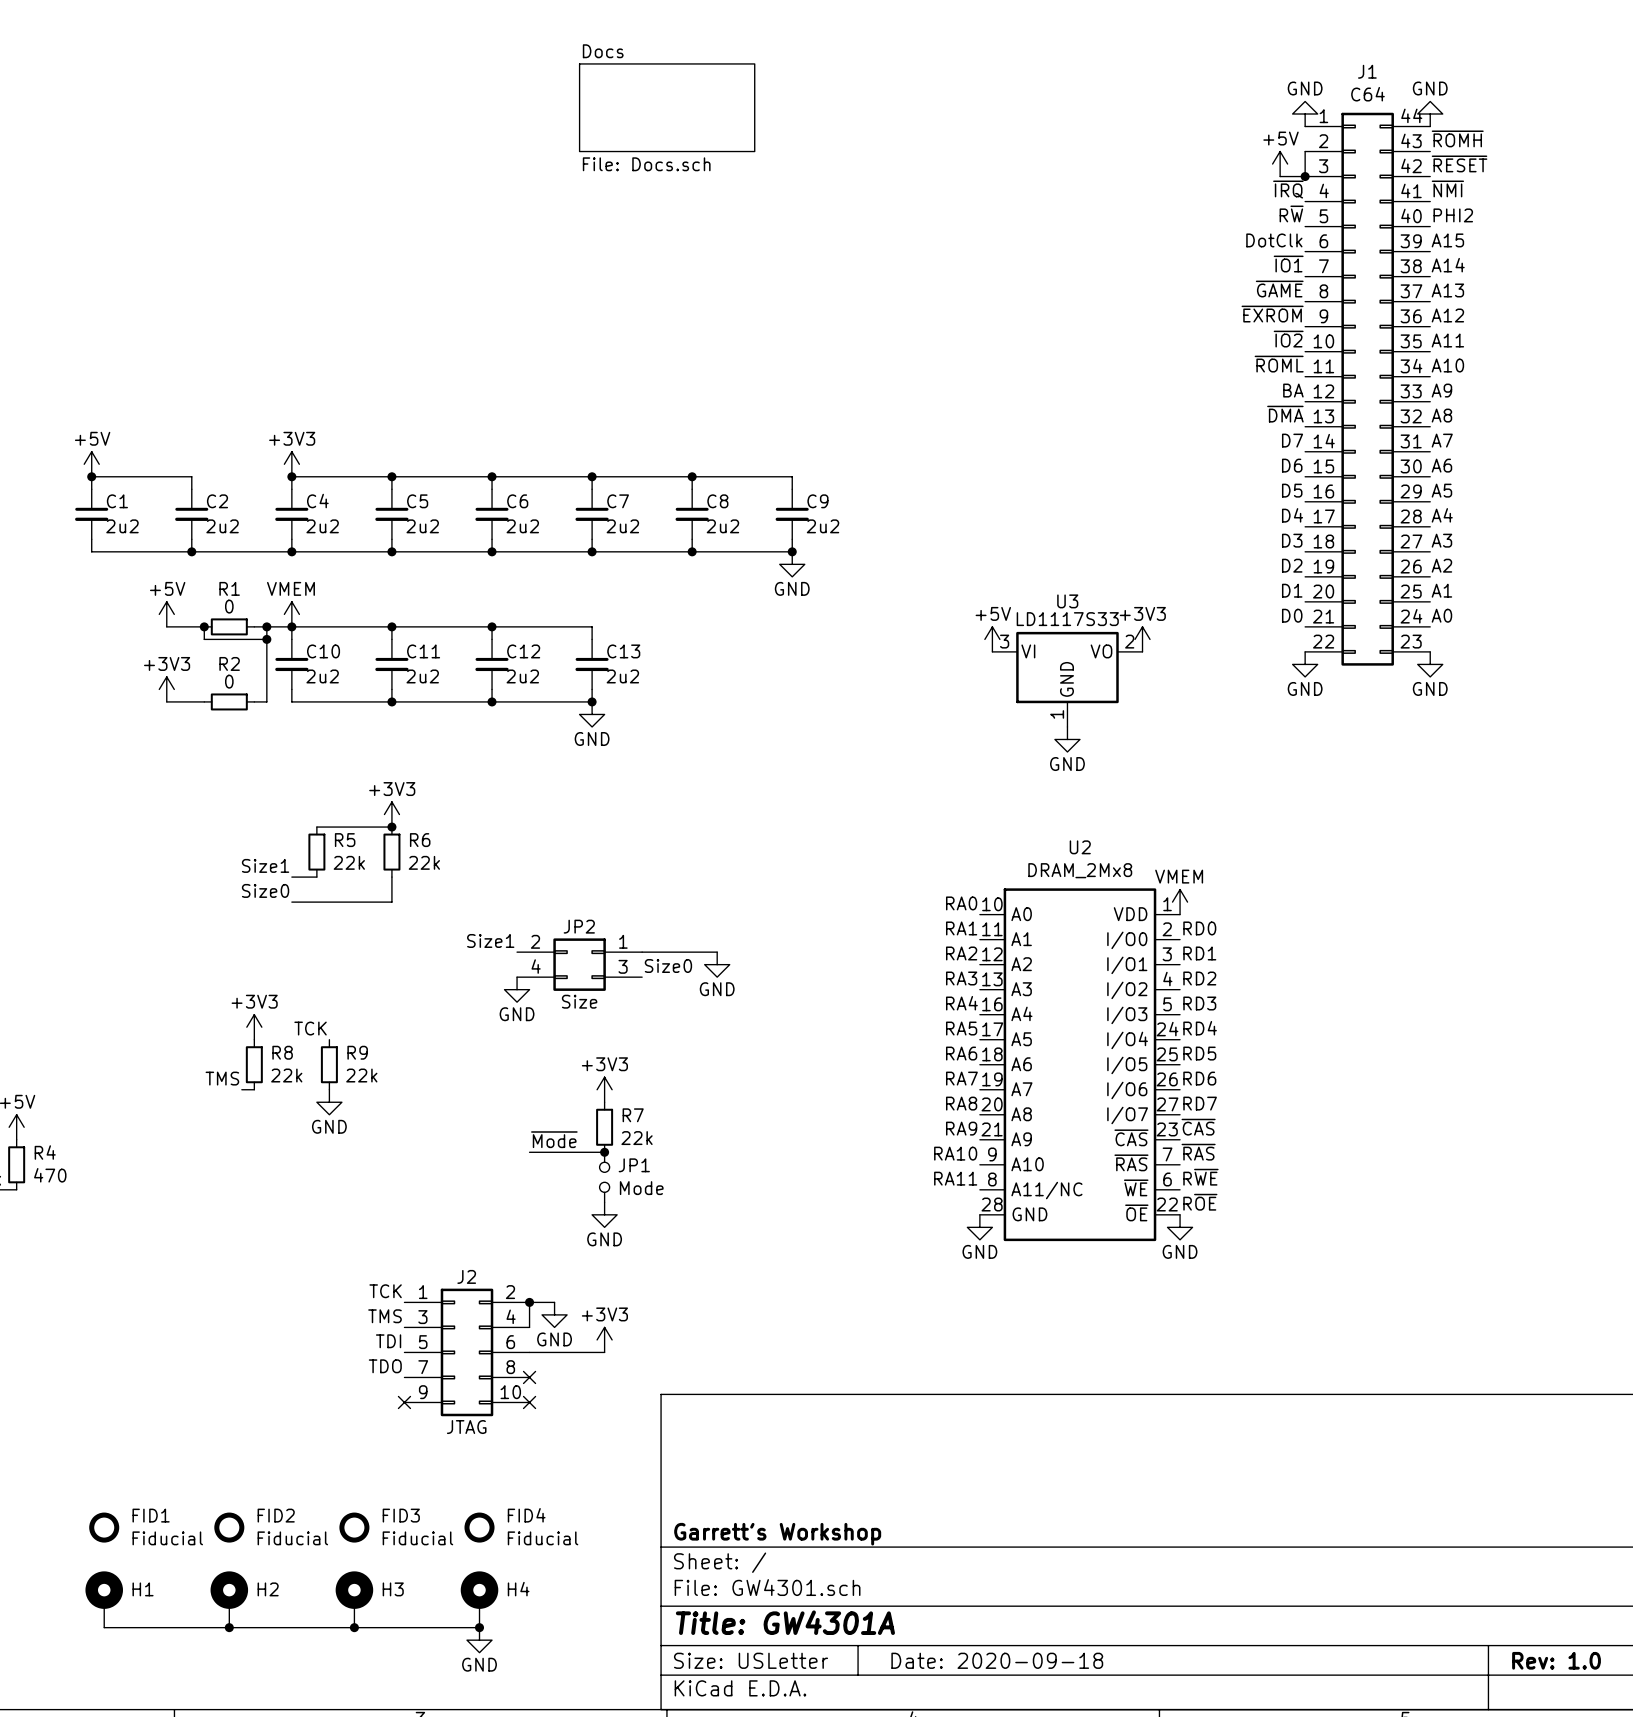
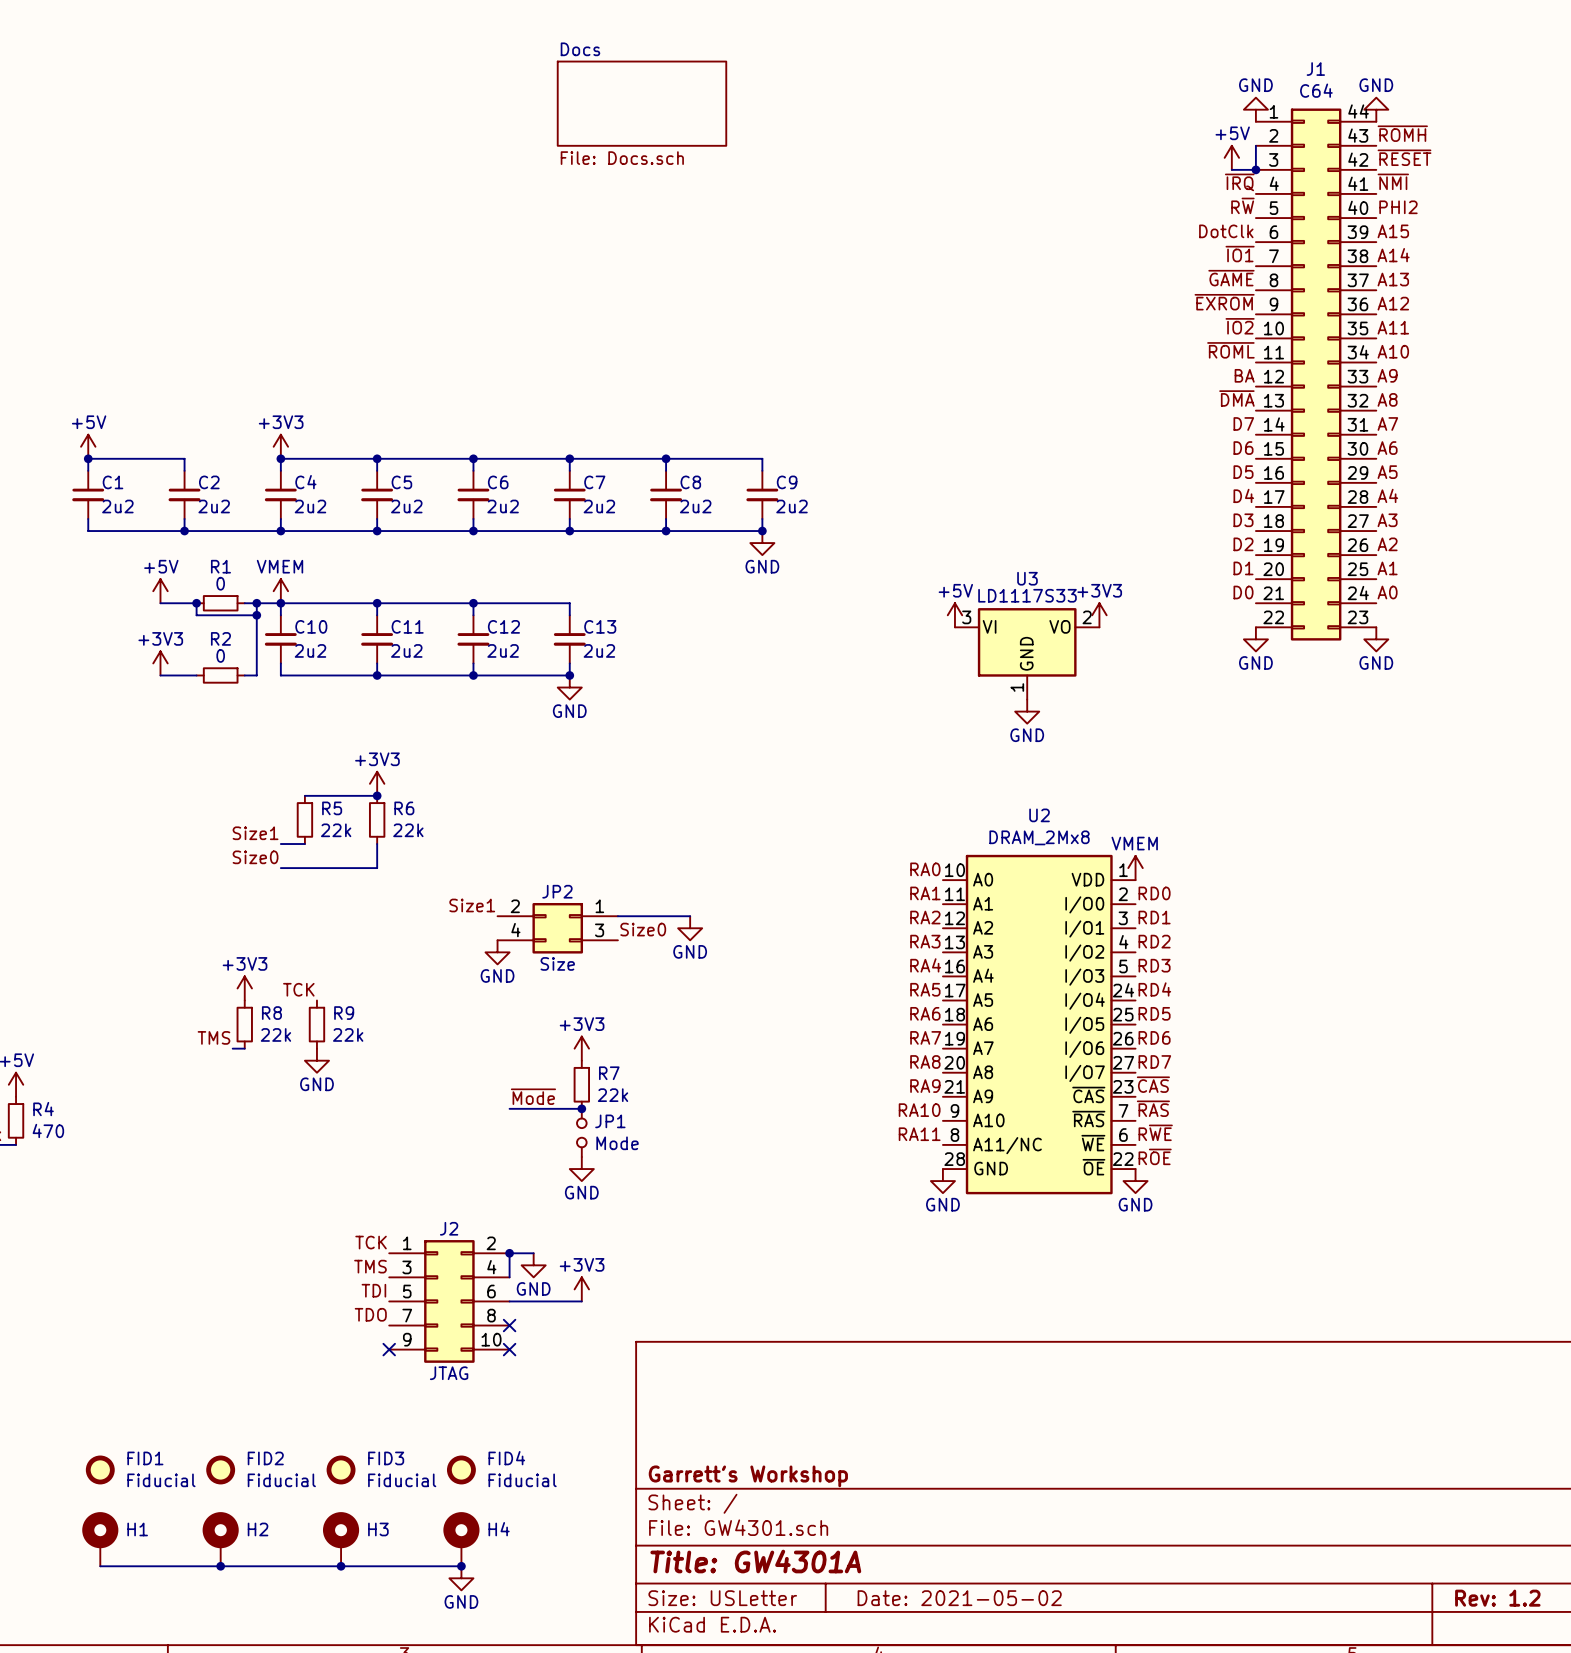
title block: Date: 2020-09-18 (997, 1660) -> Date: 2021-05-02 (959, 1598)
title block: Rev: 1.0 (1556, 1660) -> Rev: 1.2 (1497, 1598)

